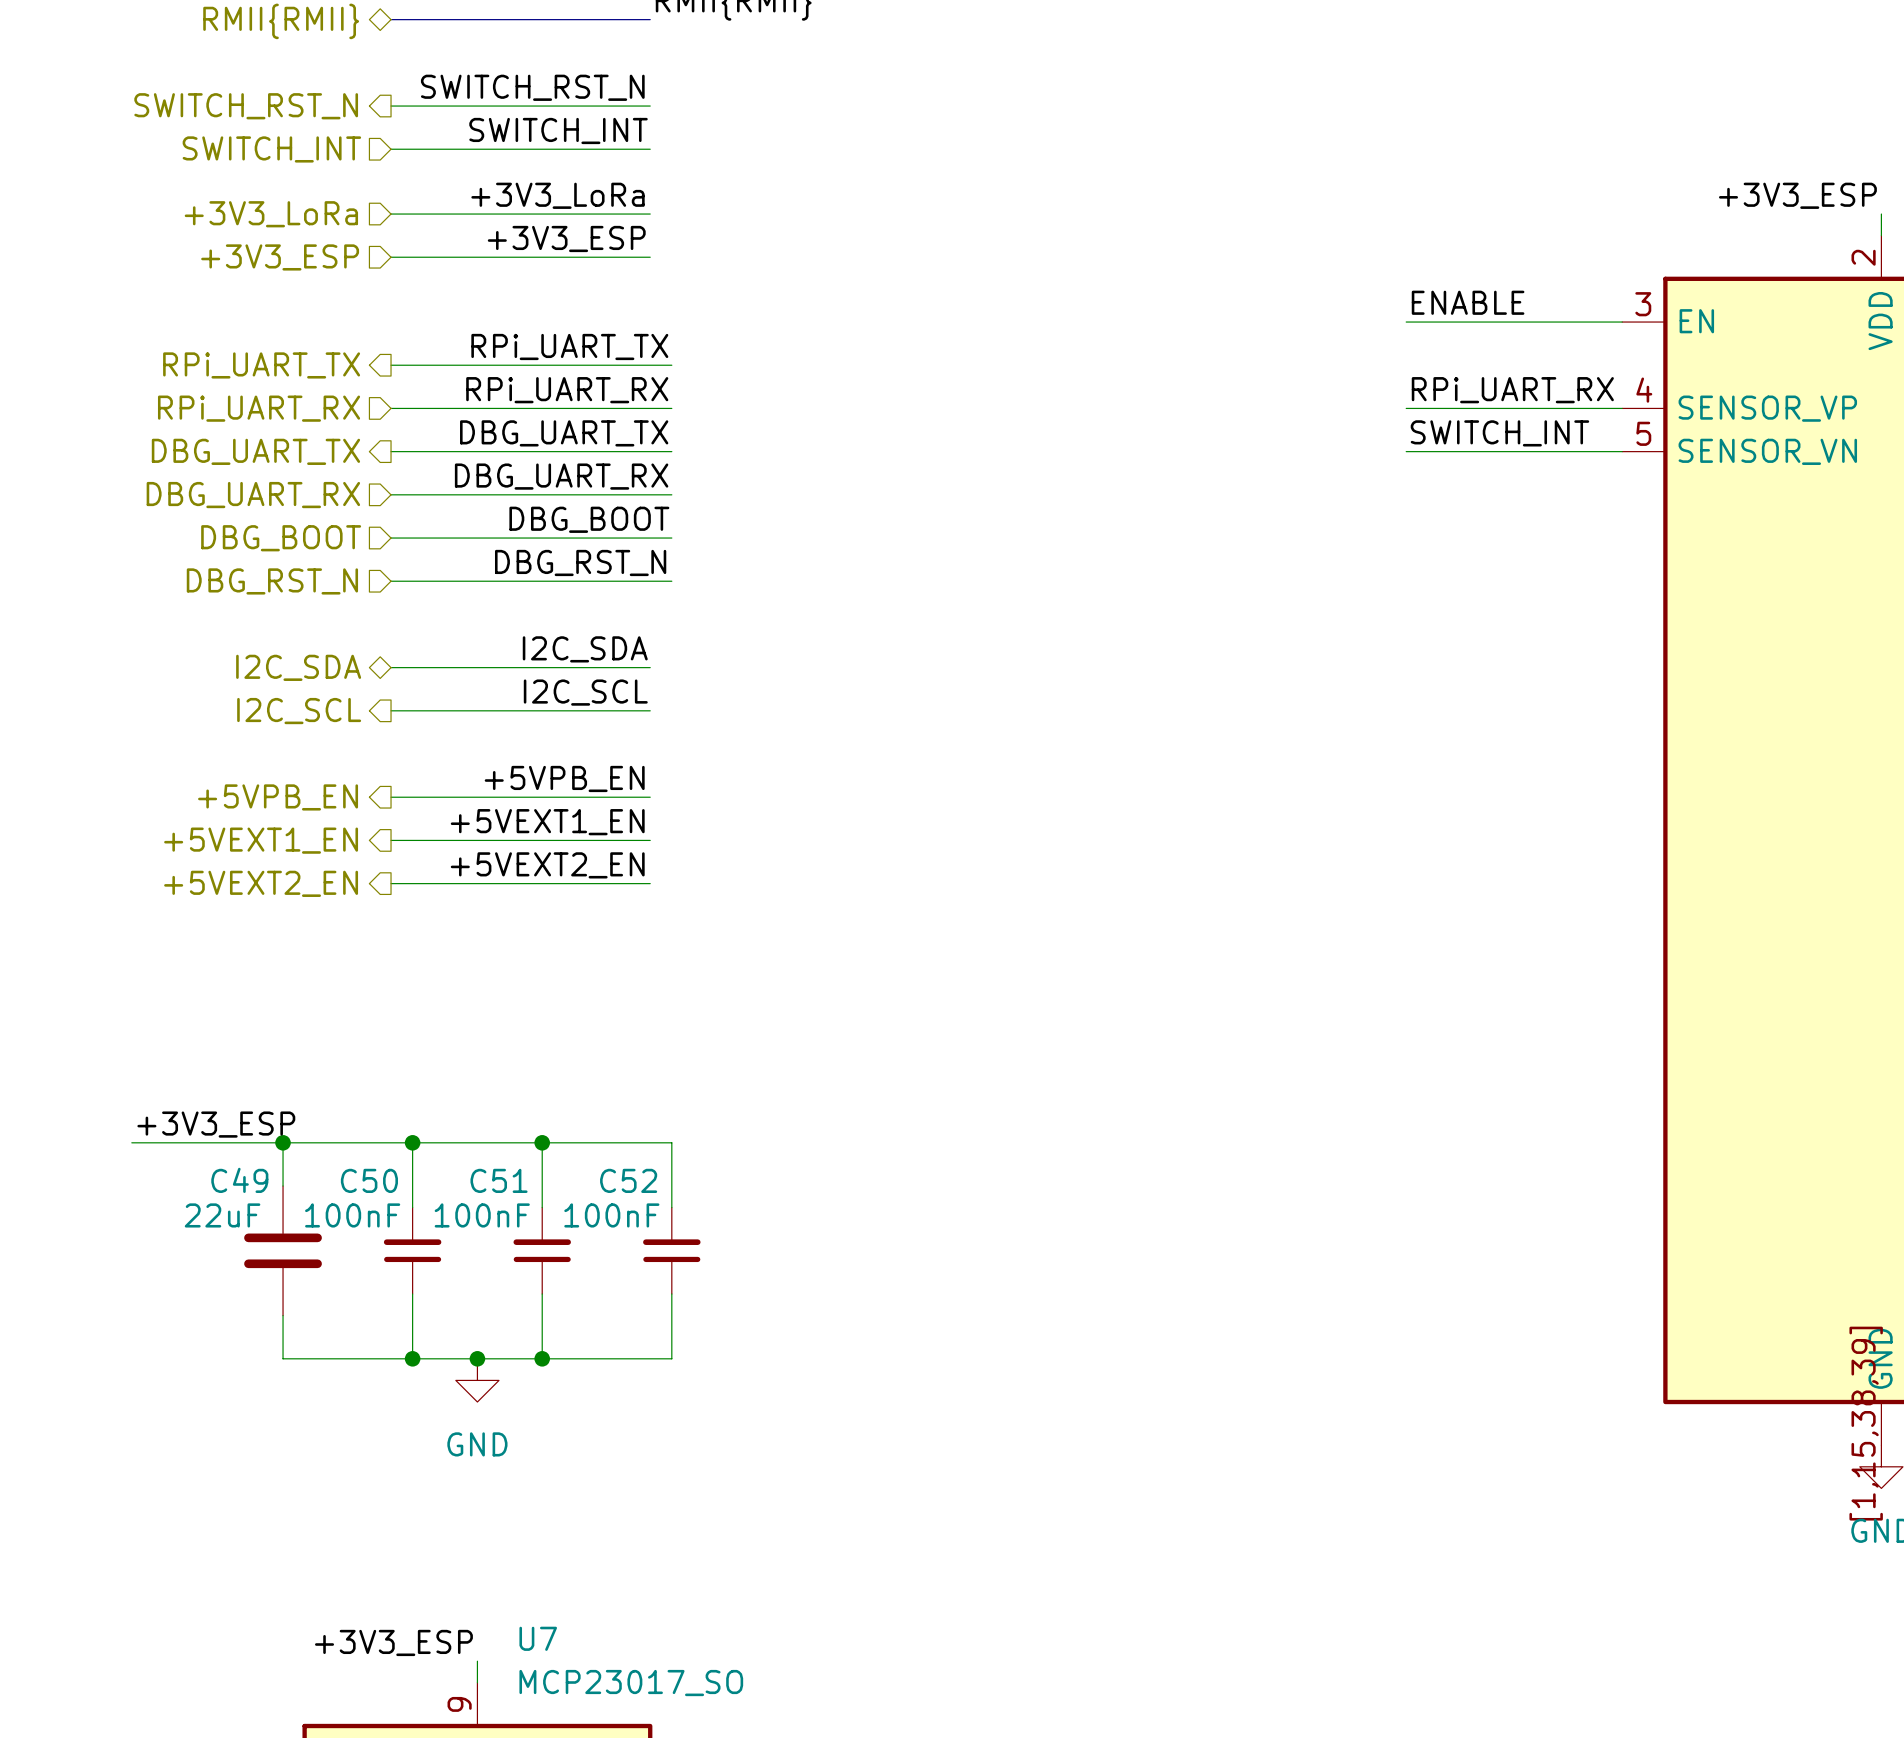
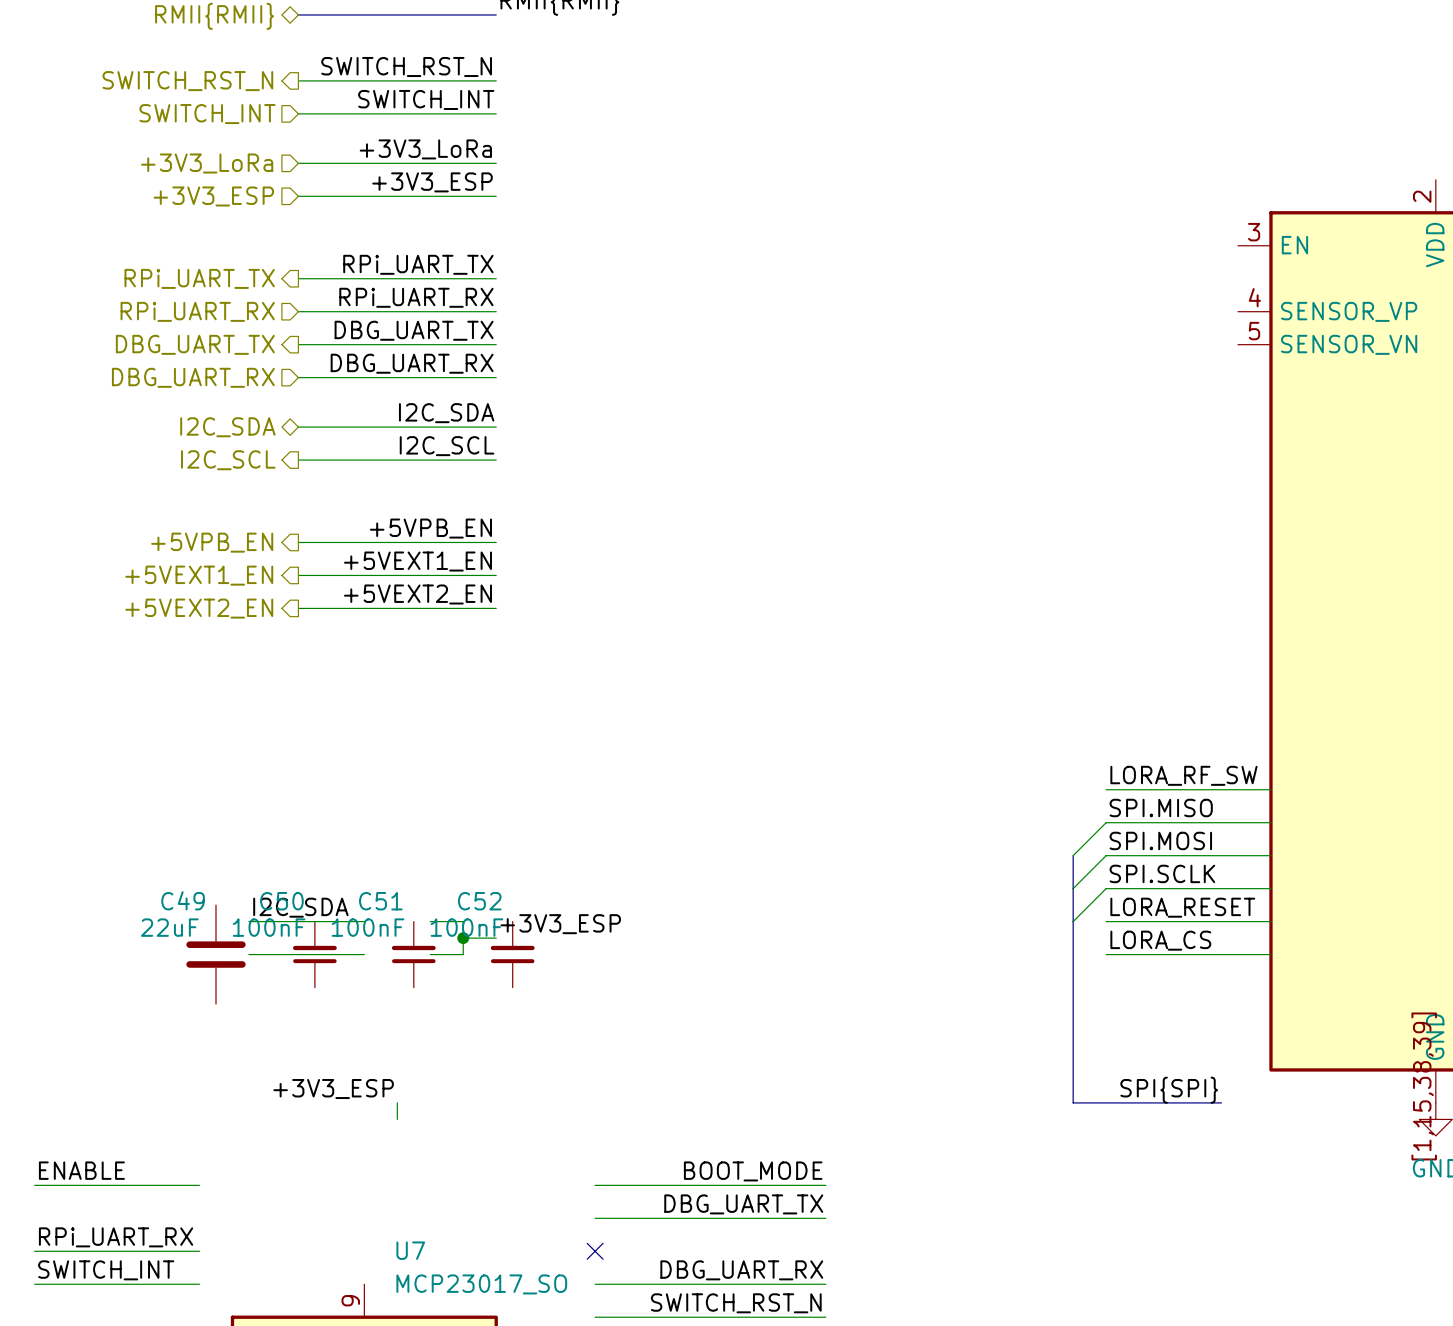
label: +3V3_ESP (1797, 195) -> none
wire: (1881, 214) (1881, 235) -> none
label: ENABLE (1468, 302) -> none
wire: (1406, 322) (1622, 322) -> none
label position: RPi_UART_TX (569, 346) -> RPi_UART_TX (418, 264)
wire: (650, 365) (671, 365) -> none
label position: RPi_UART_RX (567, 390) -> RPi_UART_RX (416, 297)
label: RPi_UART_RX (1512, 390) -> none
wire: (650, 408) (671, 408) -> none
wire: (1406, 408) (1622, 408) -> none
label position: DBG_UART_TX (564, 433) -> DBG_UART_TX (414, 330)
label: SWITCH_INT (1499, 433) -> none
wire: (650, 451) (671, 451) -> none
wire: (1406, 451) (1622, 451) -> none
label position: DBG_UART_RX (561, 476) -> DBG_UART_RX (412, 363)
wire: (650, 494) (671, 494) -> none
label: DBG_BOOT (589, 519) -> none
hierarchical label: DBG_BOOT (281, 538) -> none
wire: (391, 538) (671, 538) -> none
label: DBG_RST_N (580, 562) -> none
hierarchical label: DBG_RST_N (272, 581) -> none
wire: (391, 581) (671, 581) -> none
label: none -> I2C_SCL (447, 446)
hierarchical label: none -> I2C_SCL (228, 460)
label position: I2C_SDA (585, 649) -> I2C_SDA (446, 413)
hierarchical label position: I2C_SDA (298, 667) -> I2C_SDA (227, 427)
wire: (391, 667) (650, 667) -> (298, 575) (496, 575)
label: I2C_SCL (585, 692) -> +5VPB_EN (430, 528)
hierarchical label: I2C_SCL (299, 711) -> +5VPB_EN (212, 542)
label: +5VPB_EN (564, 778) -> +5VEXT2_EN (417, 594)
hierarchical label: +5VPB_EN (278, 797) -> +5VEXT2_EN (199, 608)
label position: +5VEXT1_EN (547, 822) -> +5VEXT1_EN (417, 561)
hierarchical label position: +5VEXT1_EN (261, 840) -> +5VEXT1_EN (199, 575)
wire: (391, 840) (650, 840) -> (298, 427) (496, 427)
label: +5VEXT2_EN (547, 865) -> none
hierarchical label: +5VEXT2_EN (261, 883) -> none
wire: (391, 883) (650, 883) -> (298, 460) (496, 460)
label: none -> LORA_RF_SW (1183, 775)
wire: none -> (1106, 789) (1270, 789)
label: none -> SPI.MISO (1161, 807)
wire: none -> (1270, 822) (1106, 822) (1073, 855)
label: none -> SPI.MOSI (1160, 840)
bus: none -> (1073, 855) (1073, 1102) (1221, 1102)
wire: none -> (1270, 855) (1106, 855) (1073, 888)
label: +3V3_ESP (216, 1124) -> none
wire: (131, 1142) (671, 1142) (671, 1207) -> none
wire: (283, 1142) (283, 1186) -> none
junction: (283, 1142) -> none
wire: (412, 1142) (412, 1207) -> none
junction: (412, 1142) -> none
wire: (542, 1142) (542, 1207) -> none
junction: (542, 1142) -> none
label: none -> SPI.SCLK (1162, 873)
wire: none -> (1270, 888) (1106, 888) (1073, 921)
label: none -> I2C_SDA (300, 907)
label: none -> LORA_RESET (1182, 907)
wire: none -> (248, 921) (364, 921)
wire: none -> (430, 921) (463, 921) (463, 954) (430, 954)
wire: none -> (1106, 921) (1270, 921)
label: none -> +3V3_ESP (560, 924)
wire: none -> (463, 938) (496, 938)
junction: none -> (463, 938)
label: none -> LORA_CS (1160, 940)
wire: none -> (248, 954) (364, 954)
wire: none -> (1106, 954) (1270, 954)
wire: (412, 1294) (412, 1358) -> none
wire: (542, 1294) (542, 1358) -> none
wire: (671, 1294) (671, 1358) (283, 1358) (283, 1315) -> none
junction: (412, 1358) -> none
junction: (477, 1358) -> none
junction: (542, 1358) -> none
power symbol: GND (477, 1380) -> none
label: none -> SPI{SPI} (1169, 1090)
label: none -> ENABLE (81, 1170)
label: none -> BOOT_MODE (753, 1171)
wire: none -> (34, 1185) (199, 1185)
wire: none -> (595, 1185) (825, 1185)
label: none -> DBG_UART_TX (743, 1204)
wire: none -> (595, 1218) (825, 1218)
label: none -> RPi_UART_RX (116, 1237)
wire: none -> (34, 1251) (199, 1251)
no-connect mark: none -> (595, 1251)
label position: +3V3_ESP (393, 1642) -> +3V3_ESP (333, 1089)
wire: (477, 1661) (477, 1682) -> (397, 1102) (397, 1119)
label: none -> SWITCH_INT (106, 1270)
label: none -> DBG_UART_RX (741, 1270)
wire: none -> (34, 1284) (199, 1284)
wire: none -> (595, 1284) (825, 1284)
label: none -> SWITCH_RST_N (736, 1303)
wire: none -> (595, 1317) (825, 1317)

